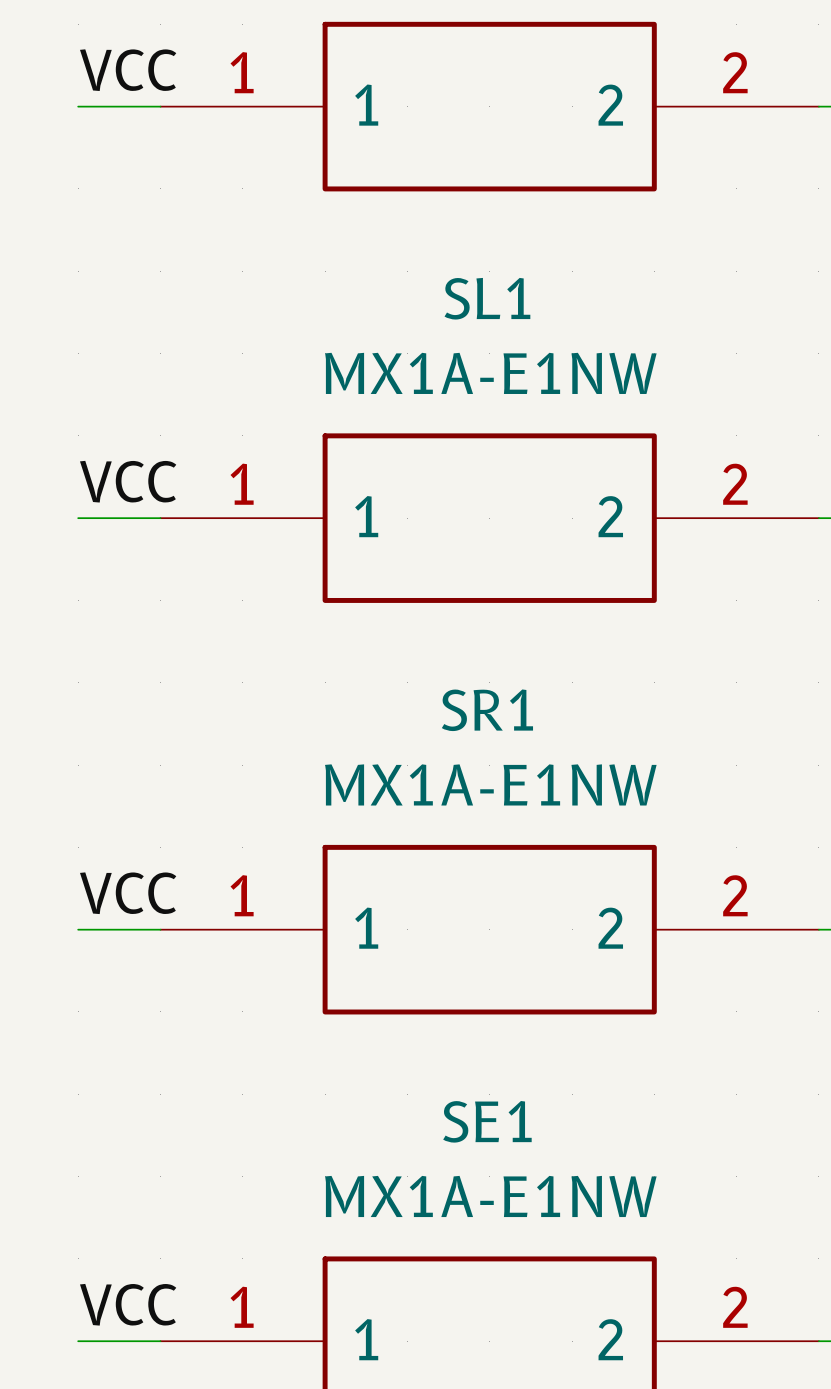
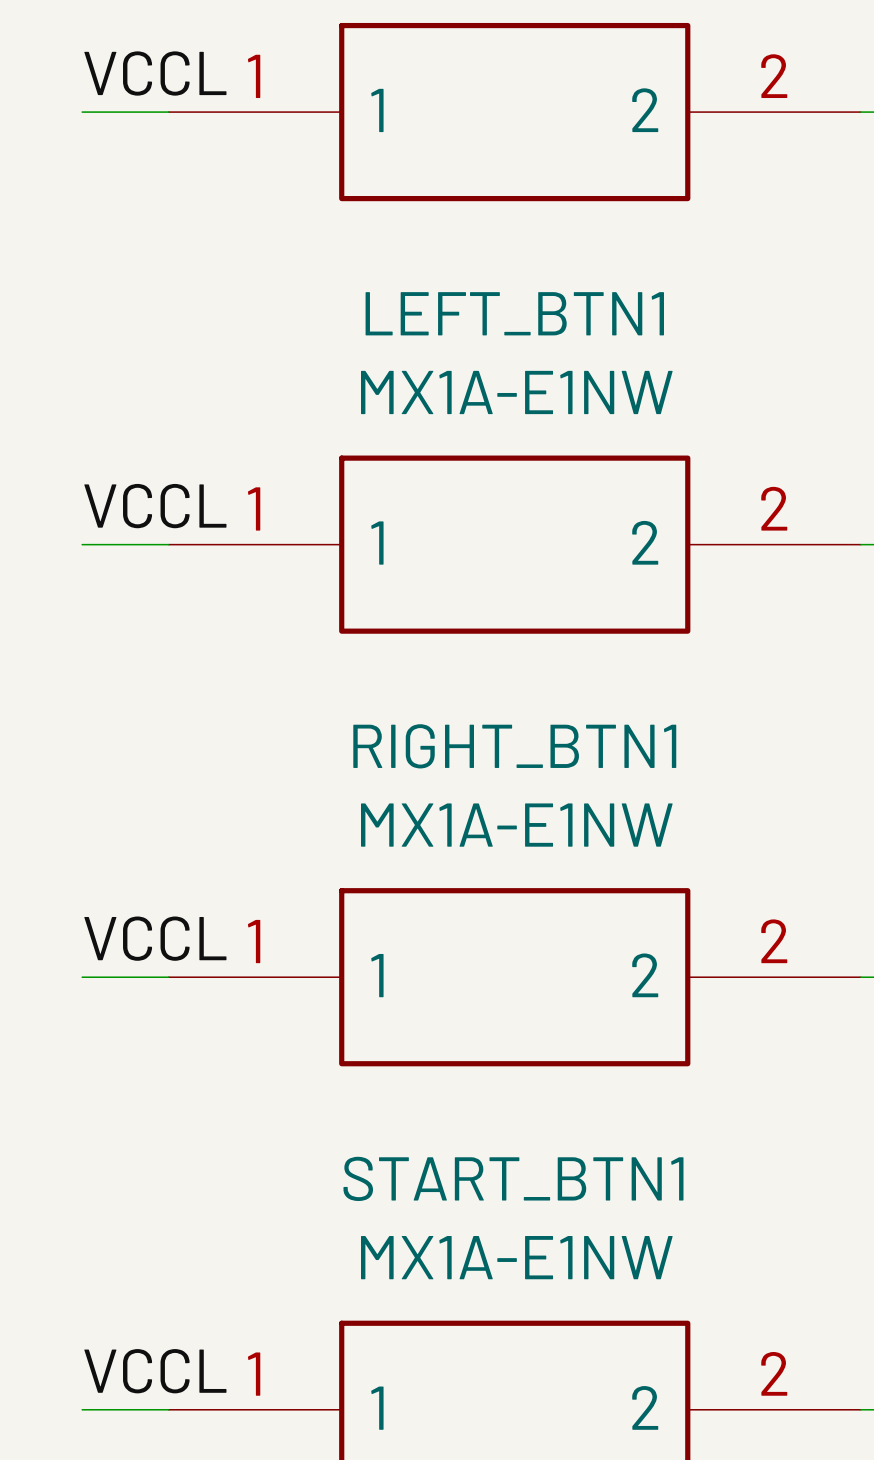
label: VCC (128, 70) -> VCCL (155, 73)
SL1 name: SL1 (487, 298) -> LEFT_BTN1 (514, 313)
label: VCC (128, 481) -> VCCL (155, 506)
SR1 name: SR1 (487, 710) -> RIGHT_BTN1 (514, 746)
label: VCC (128, 893) -> VCCL (155, 938)
SE1 name: SE1 (487, 1121) -> START_BTN1 (513, 1178)
label: VCC (128, 1304) -> VCCL (155, 1371)

